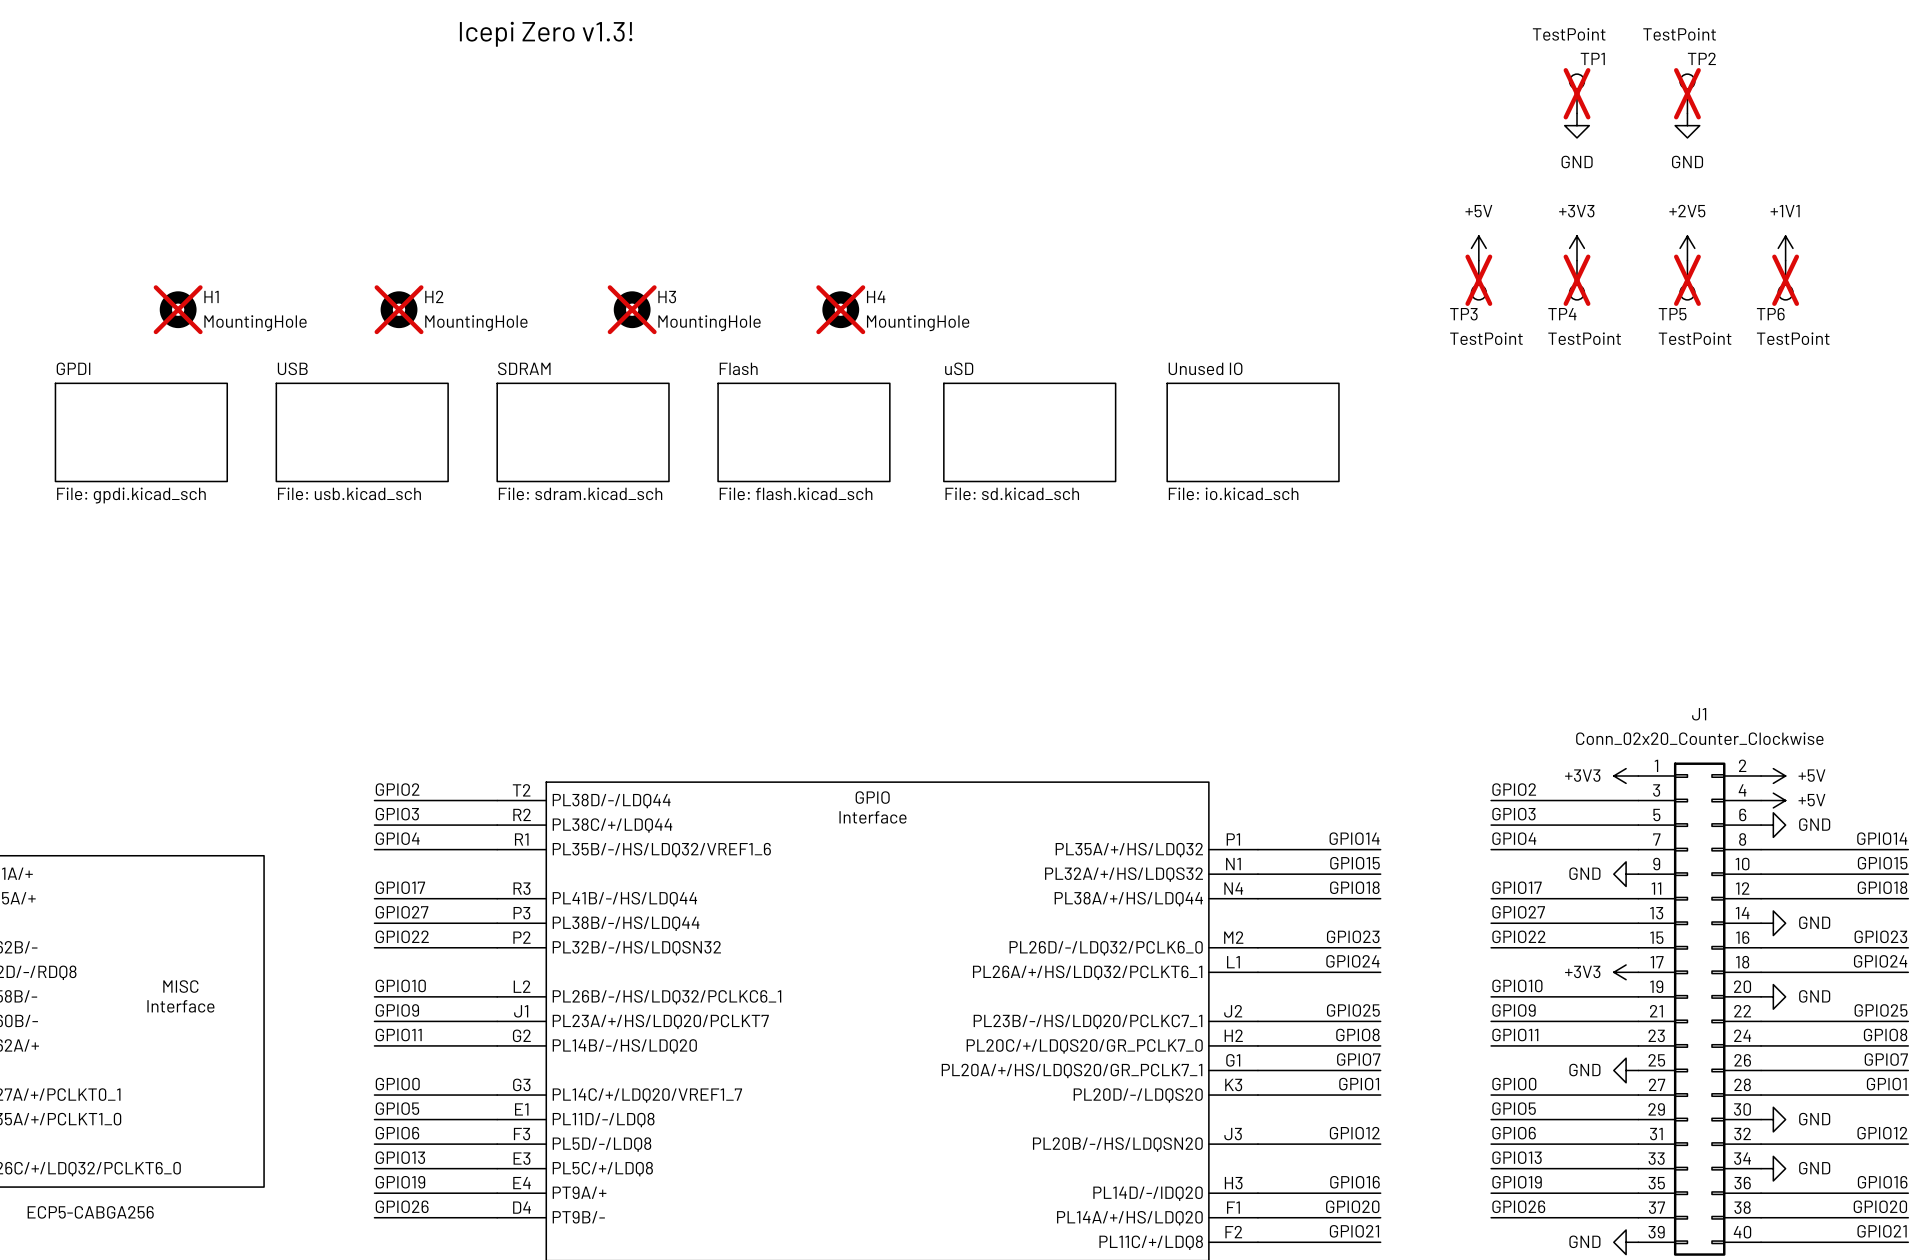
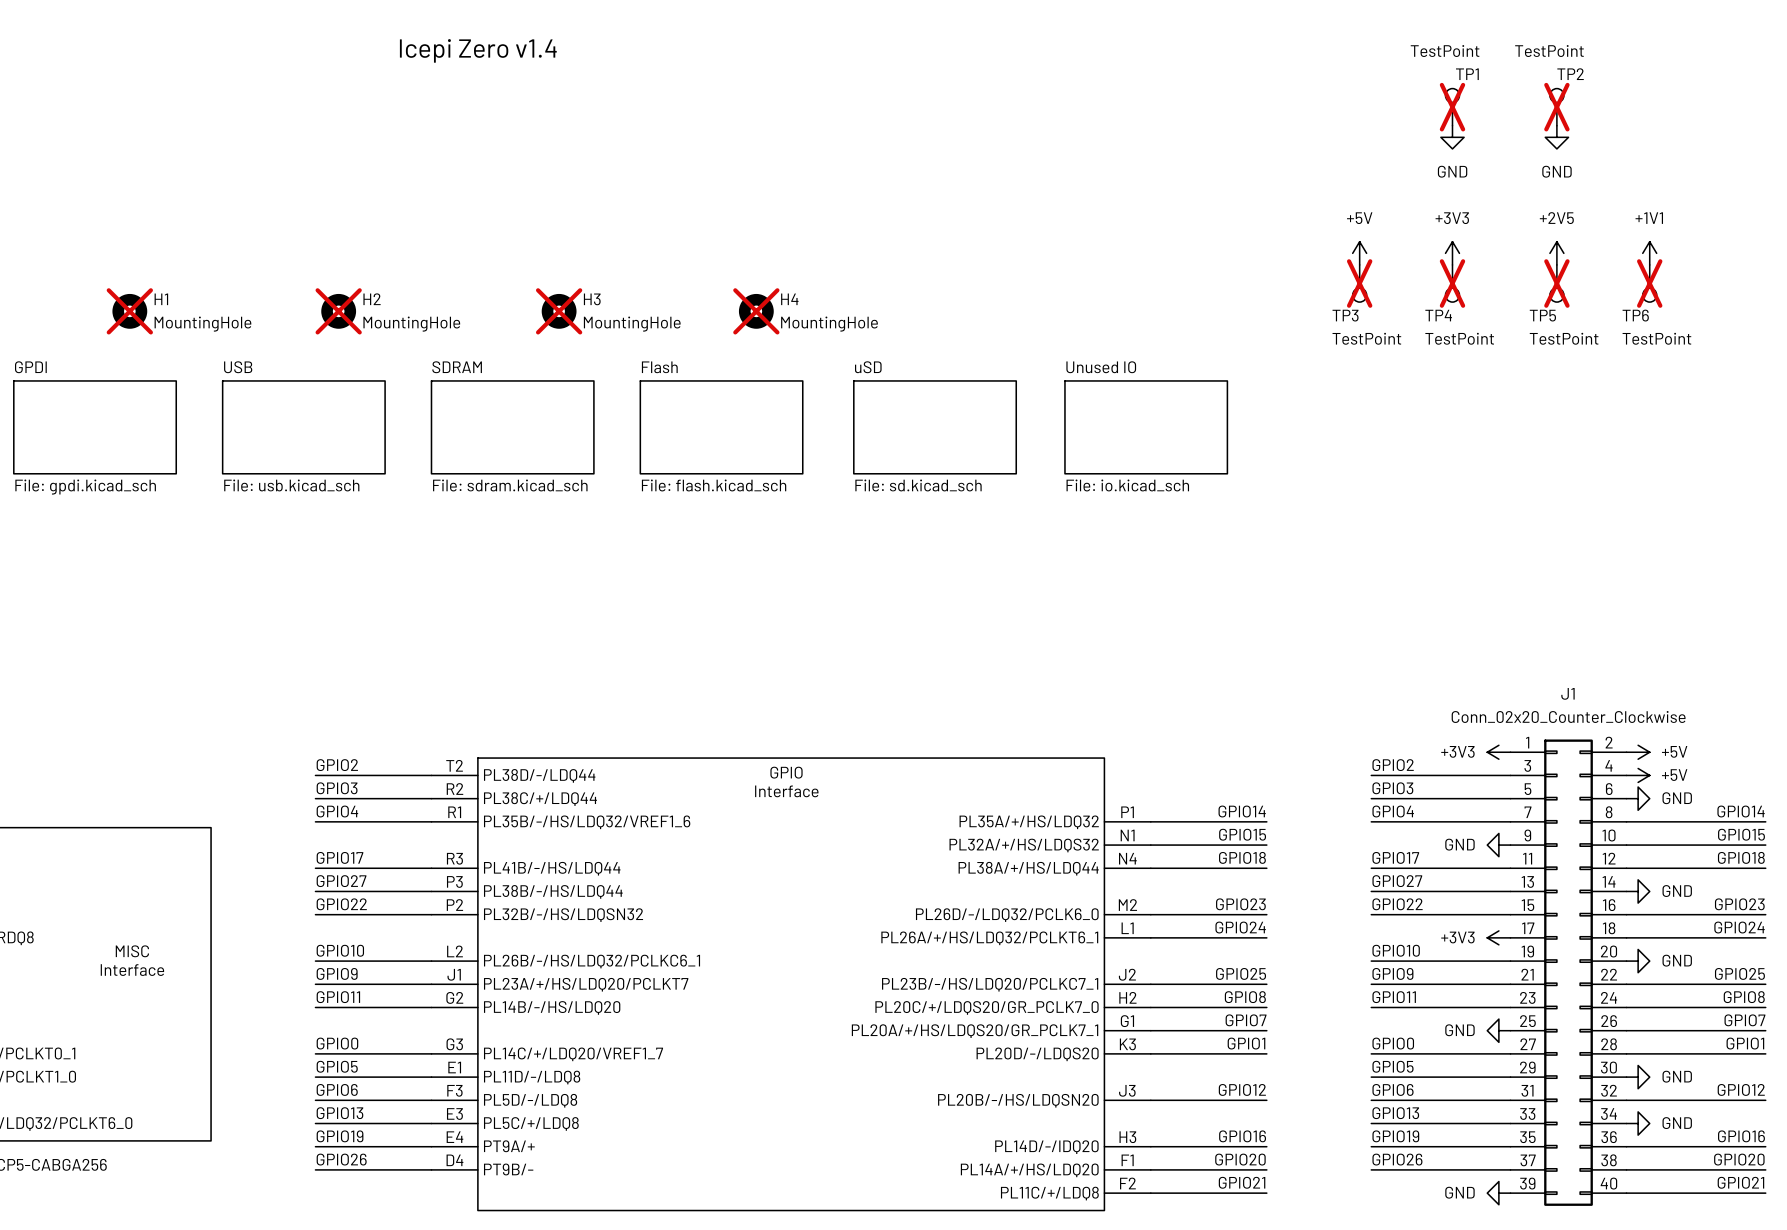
text: Icepi Zero v1.3! (546, 34) -> Icepi Zero v1.4 (478, 50)

